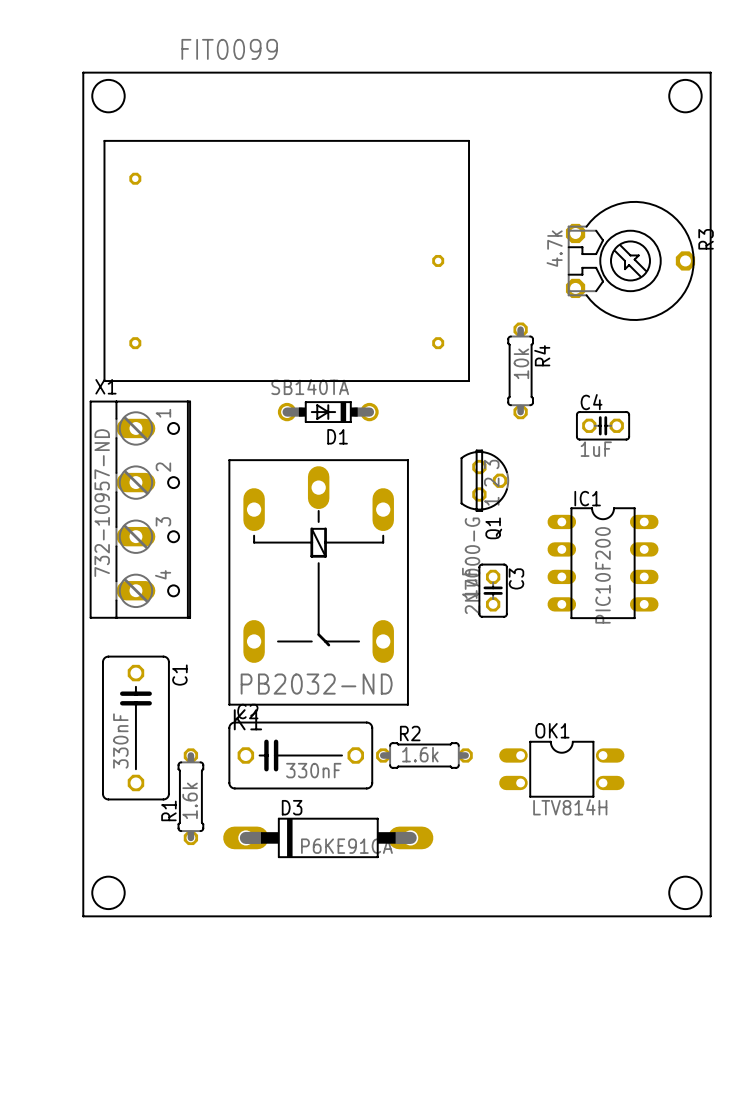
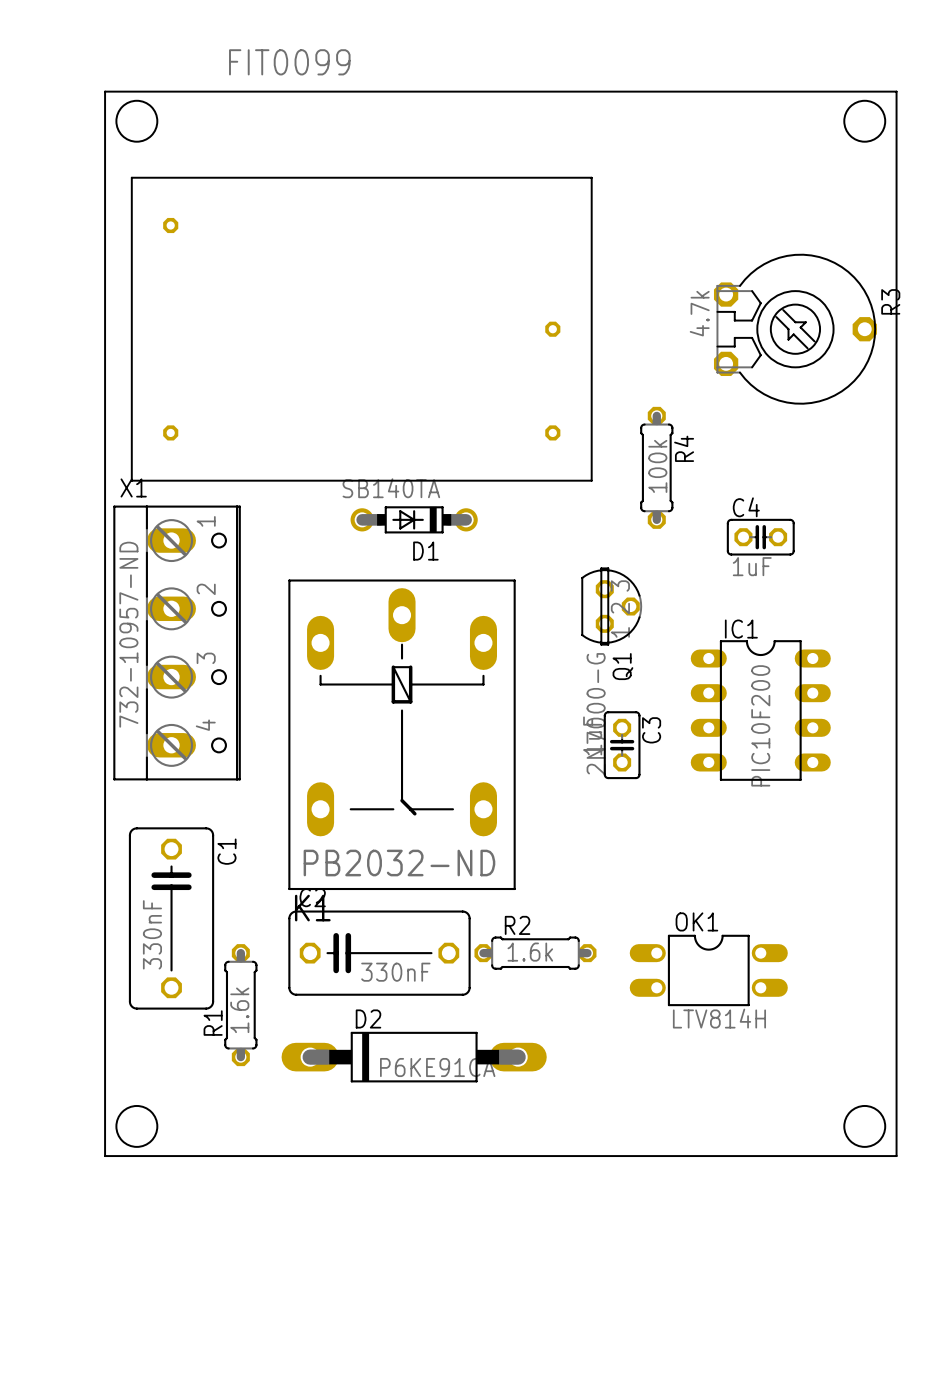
R4 value: 10k (521, 363) -> 100k (657, 466)
D3 name: D3 (292, 807) -> D2 (368, 1018)

